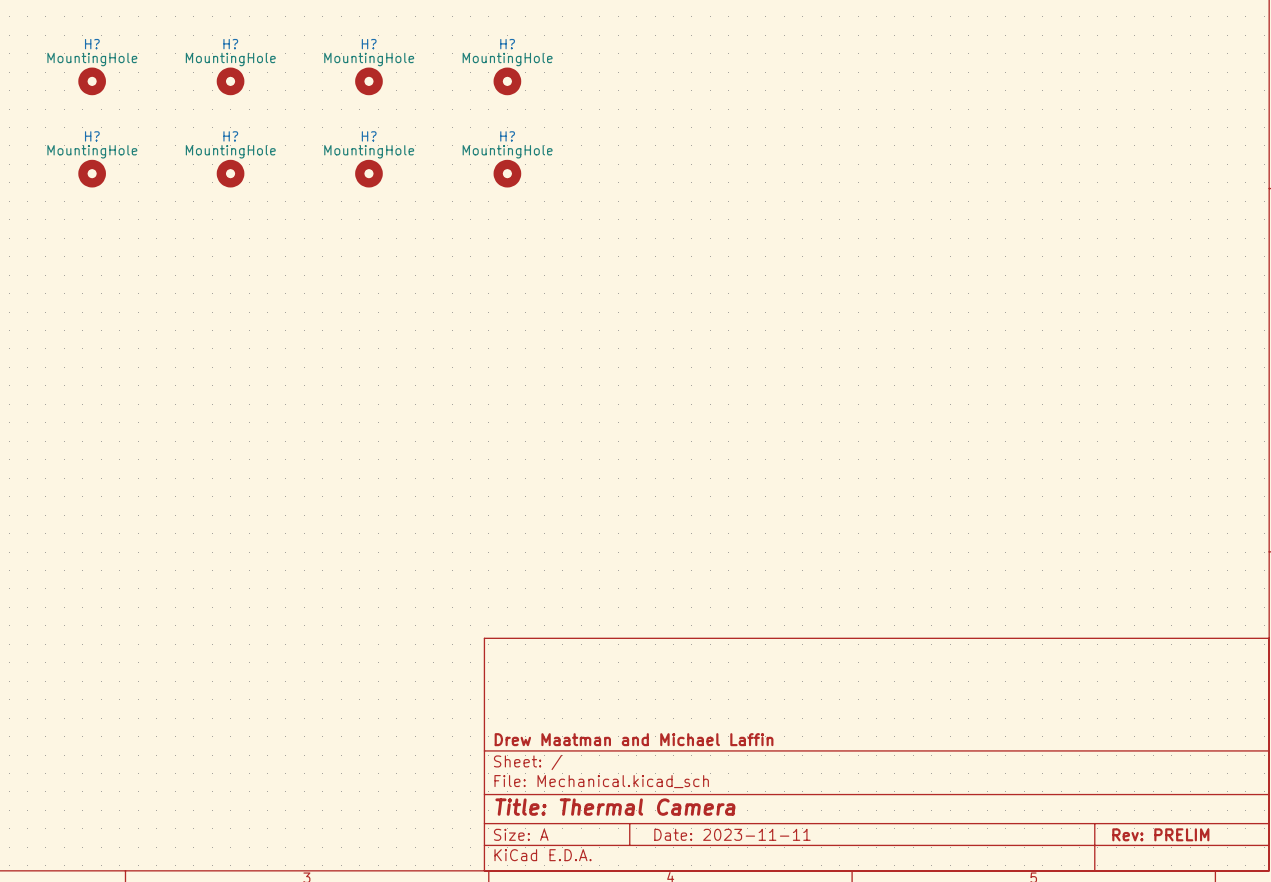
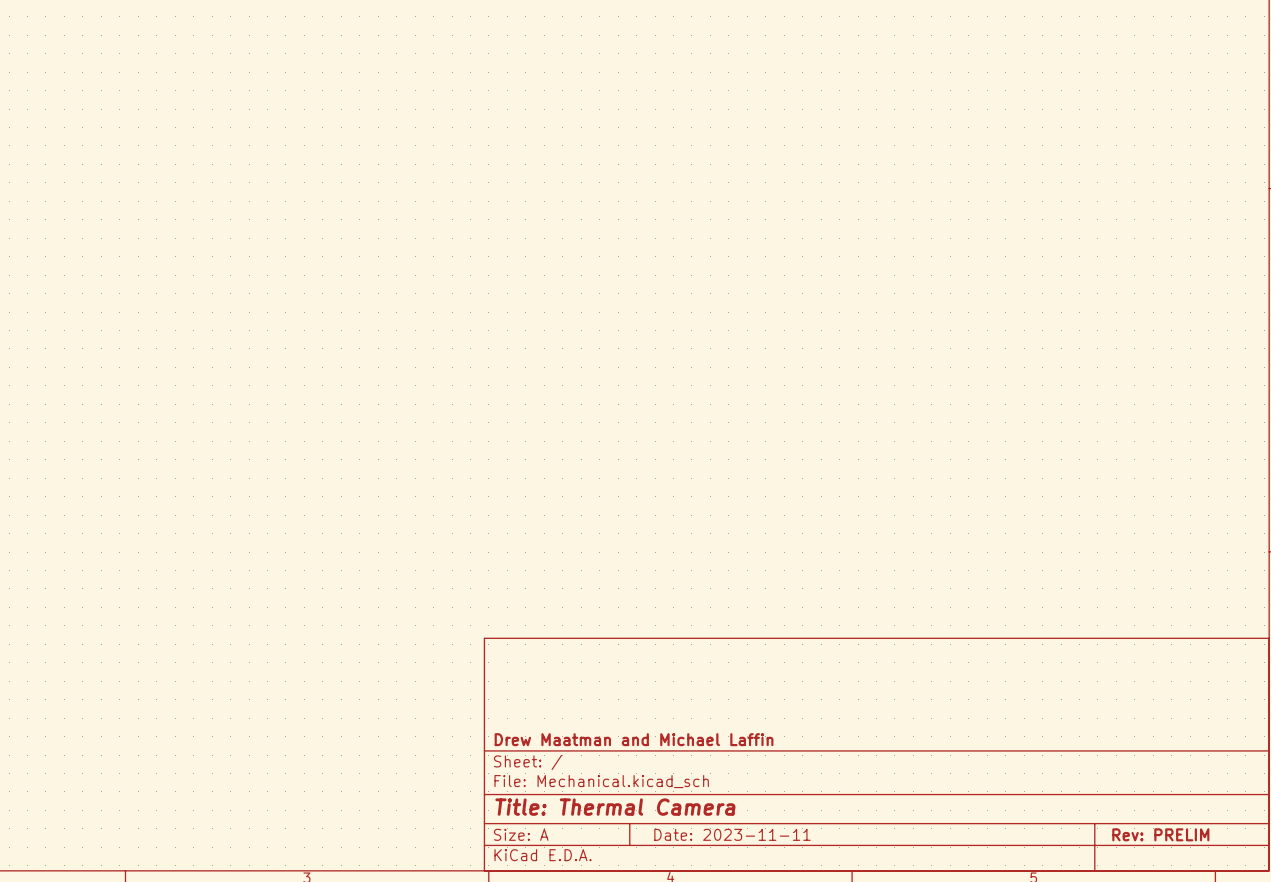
H?: MountingHole (92, 81) -> none
H?: MountingHole (230, 81) -> none
H?: MountingHole (368, 81) -> none
H?: MountingHole (507, 81) -> none
H?: MountingHole (92, 173) -> none
H?: MountingHole (230, 173) -> none
H?: MountingHole (368, 173) -> none
H?: MountingHole (507, 173) -> none

